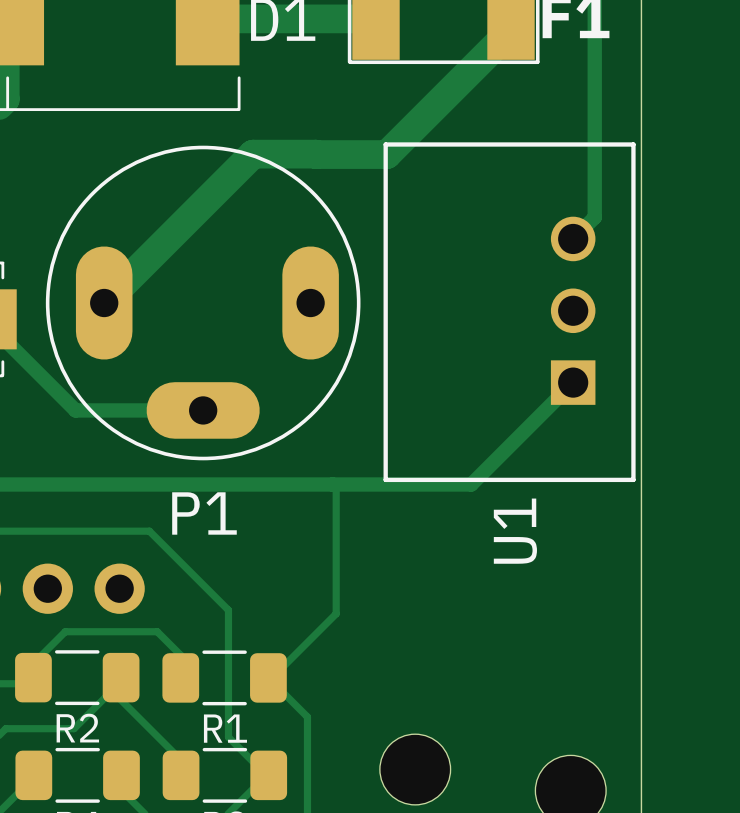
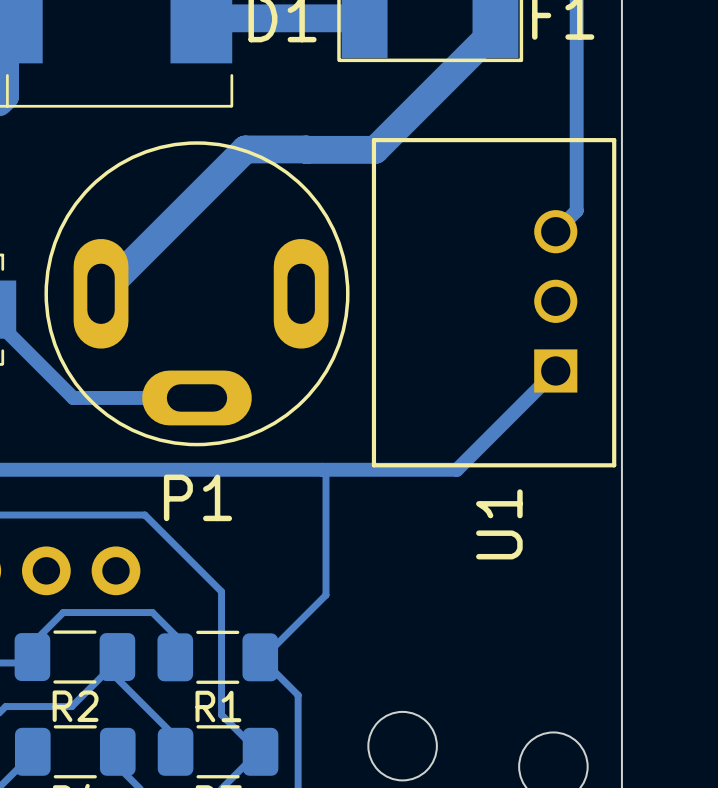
part footprint: [45, 145, 361, 461] -> [44, 141, 350, 447]

